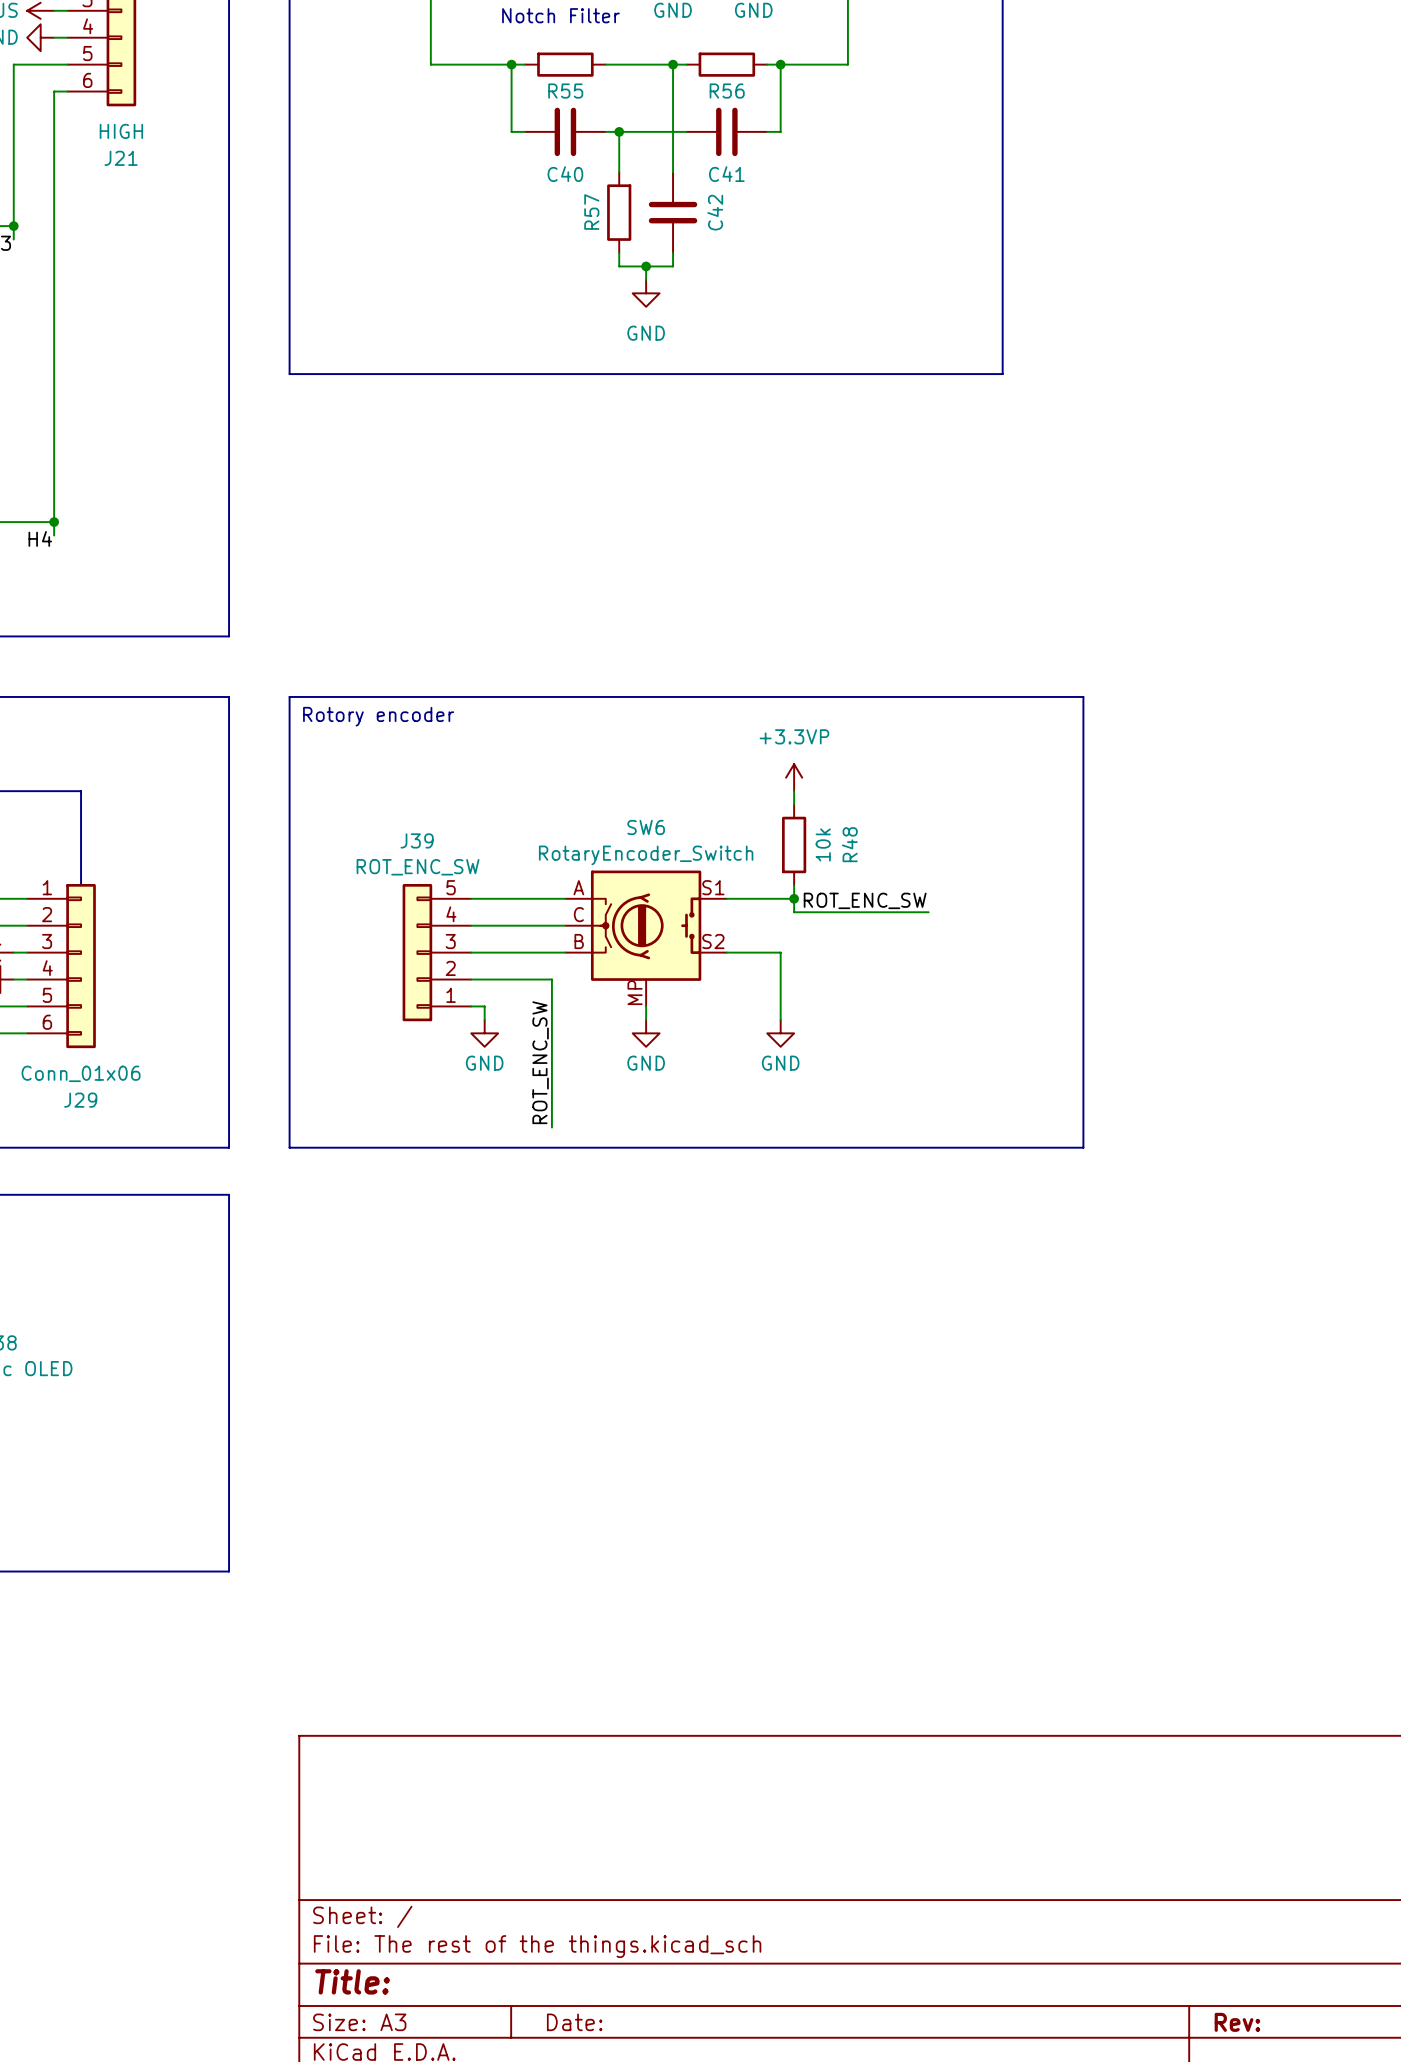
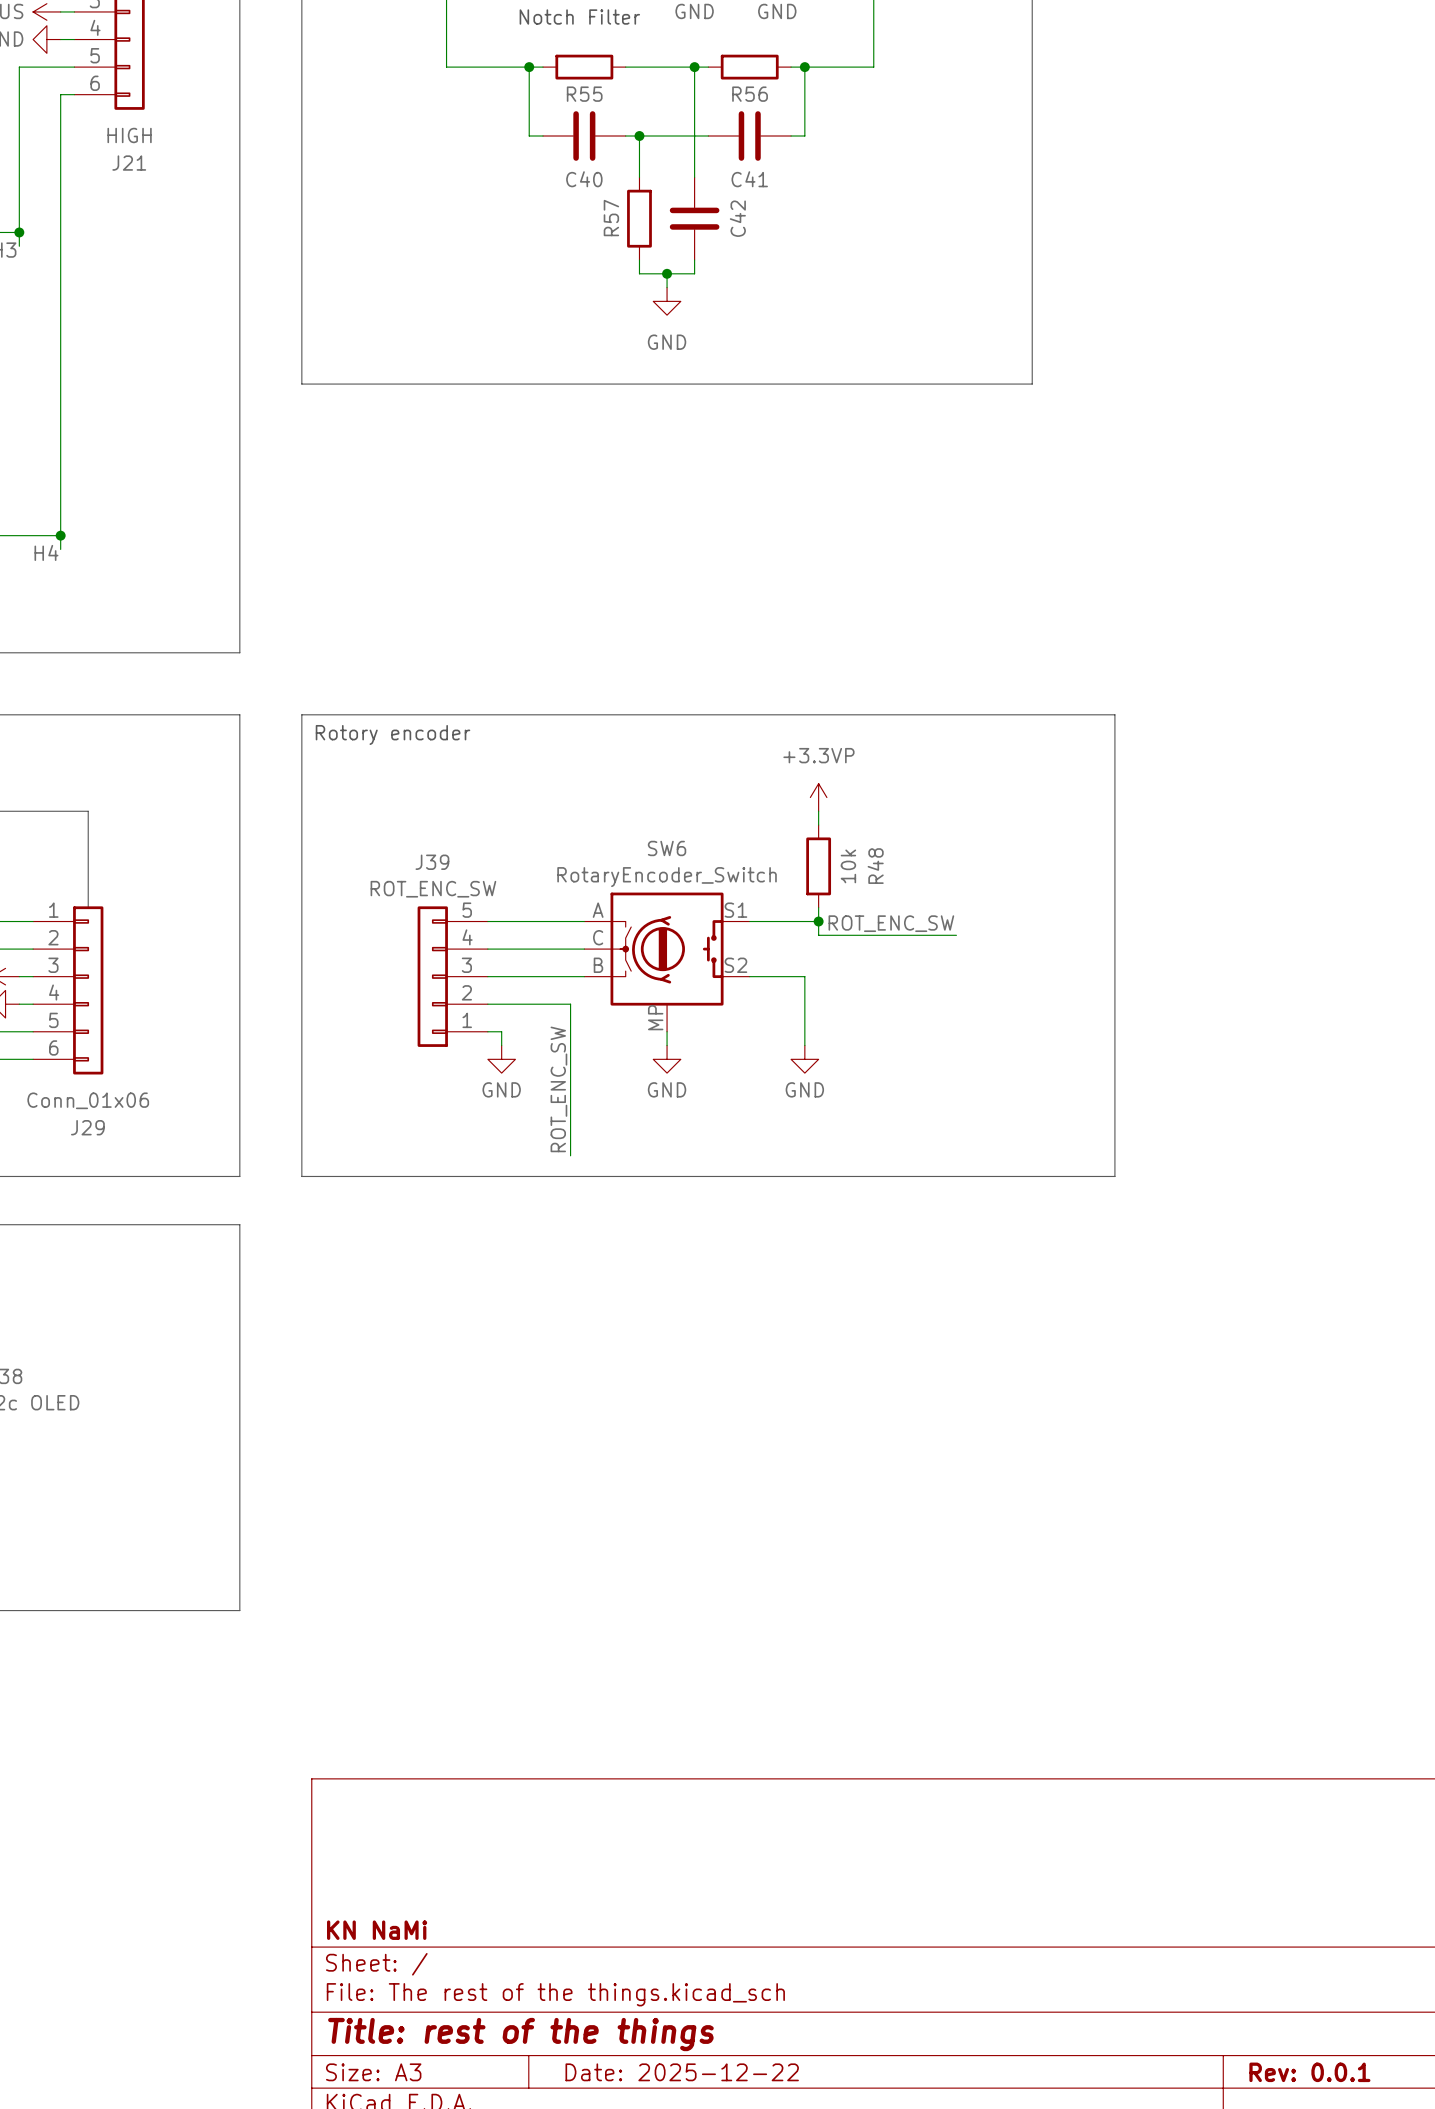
title block: none -> KN NaMi (377, 1930)
title block: Title: (352, 1981) -> Title: rest of the things (520, 2034)
title block: Date: (574, 2022) -> Date: 2025-12-22 (682, 2072)
title block: Rev: (1237, 2022) -> Rev: 0.0.1 (1309, 2072)

